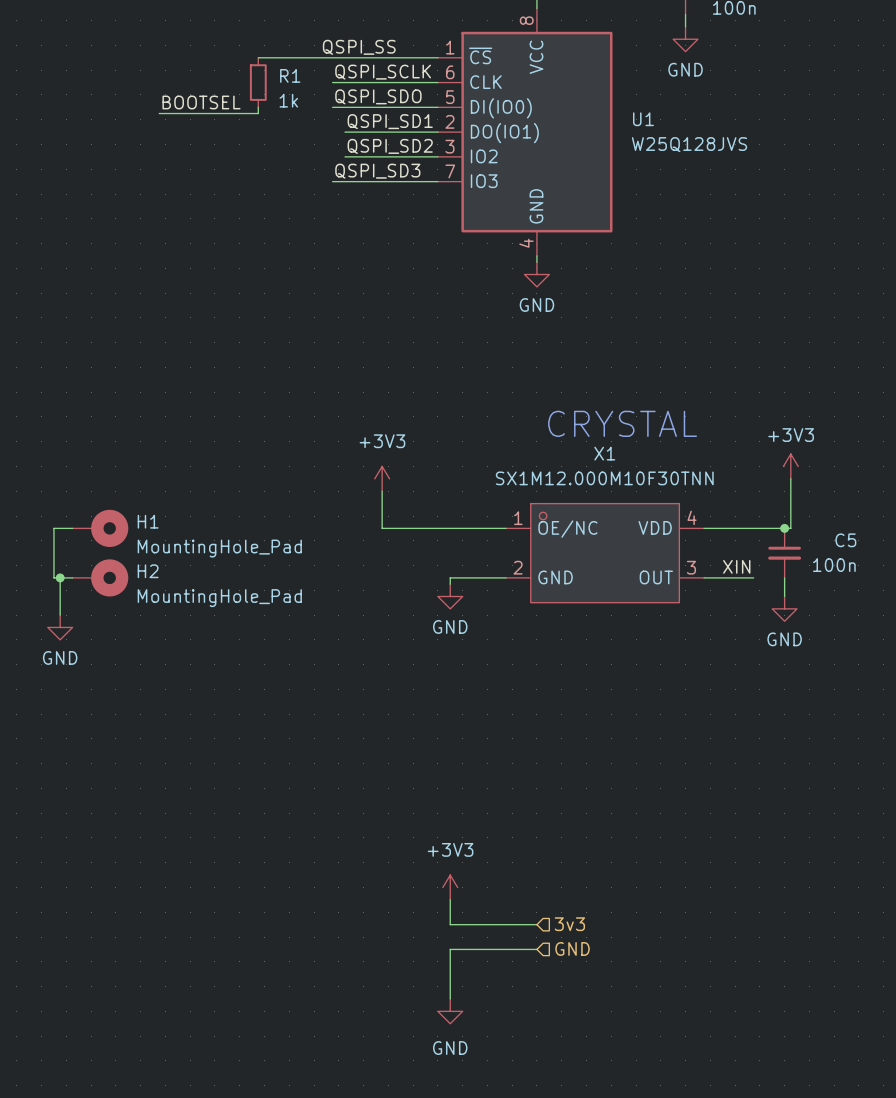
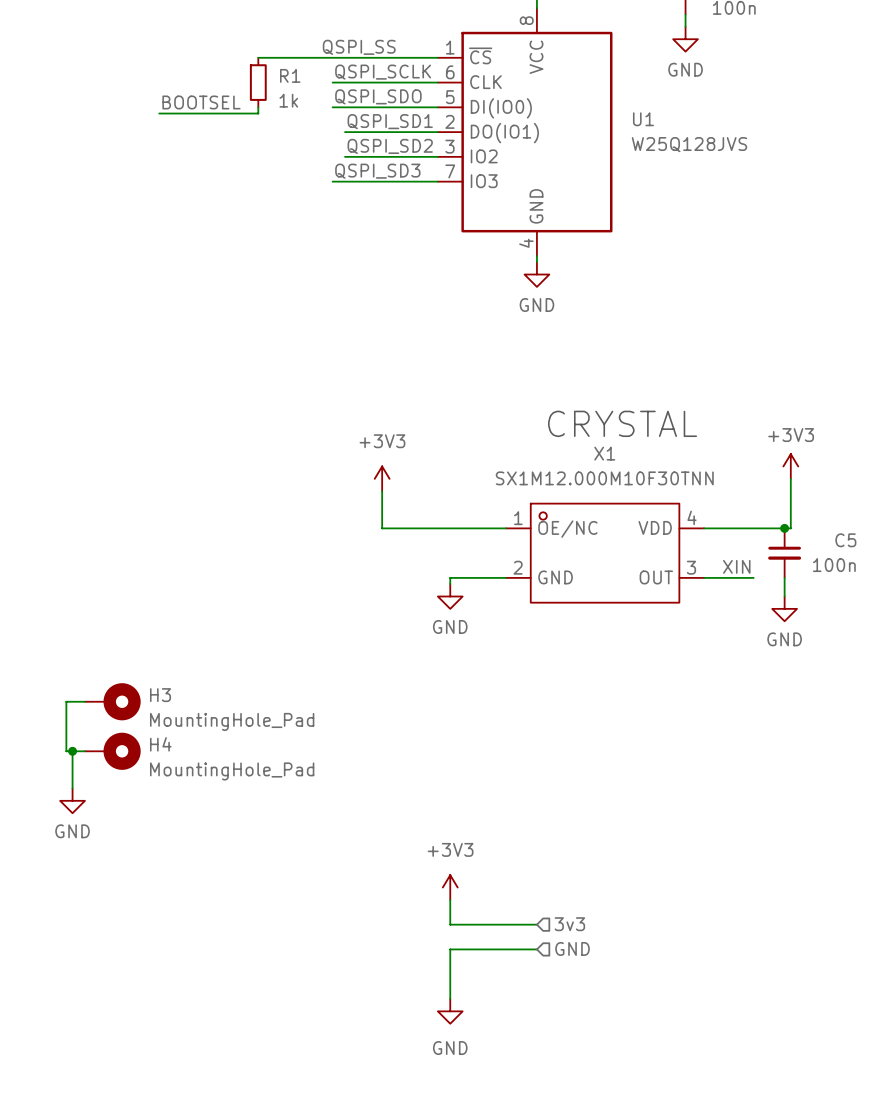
wire: (72, 528) (53, 528) (53, 577) (72, 577) -> (84, 701) (66, 701) (66, 751) (84, 751)
H1: MountingHole_Pad (100, 528) -> none
wire: (60, 577) (60, 615) -> (72, 751) (72, 788)
junction: (60, 577) -> none
H2: MountingHole_Pad (100, 577) -> none
power symbol position: GND (60, 627) -> GND (72, 800)
H3: none -> MountingHole_Pad (112, 701)
junction: none -> (72, 751)
H4: none -> MountingHole_Pad (112, 751)

